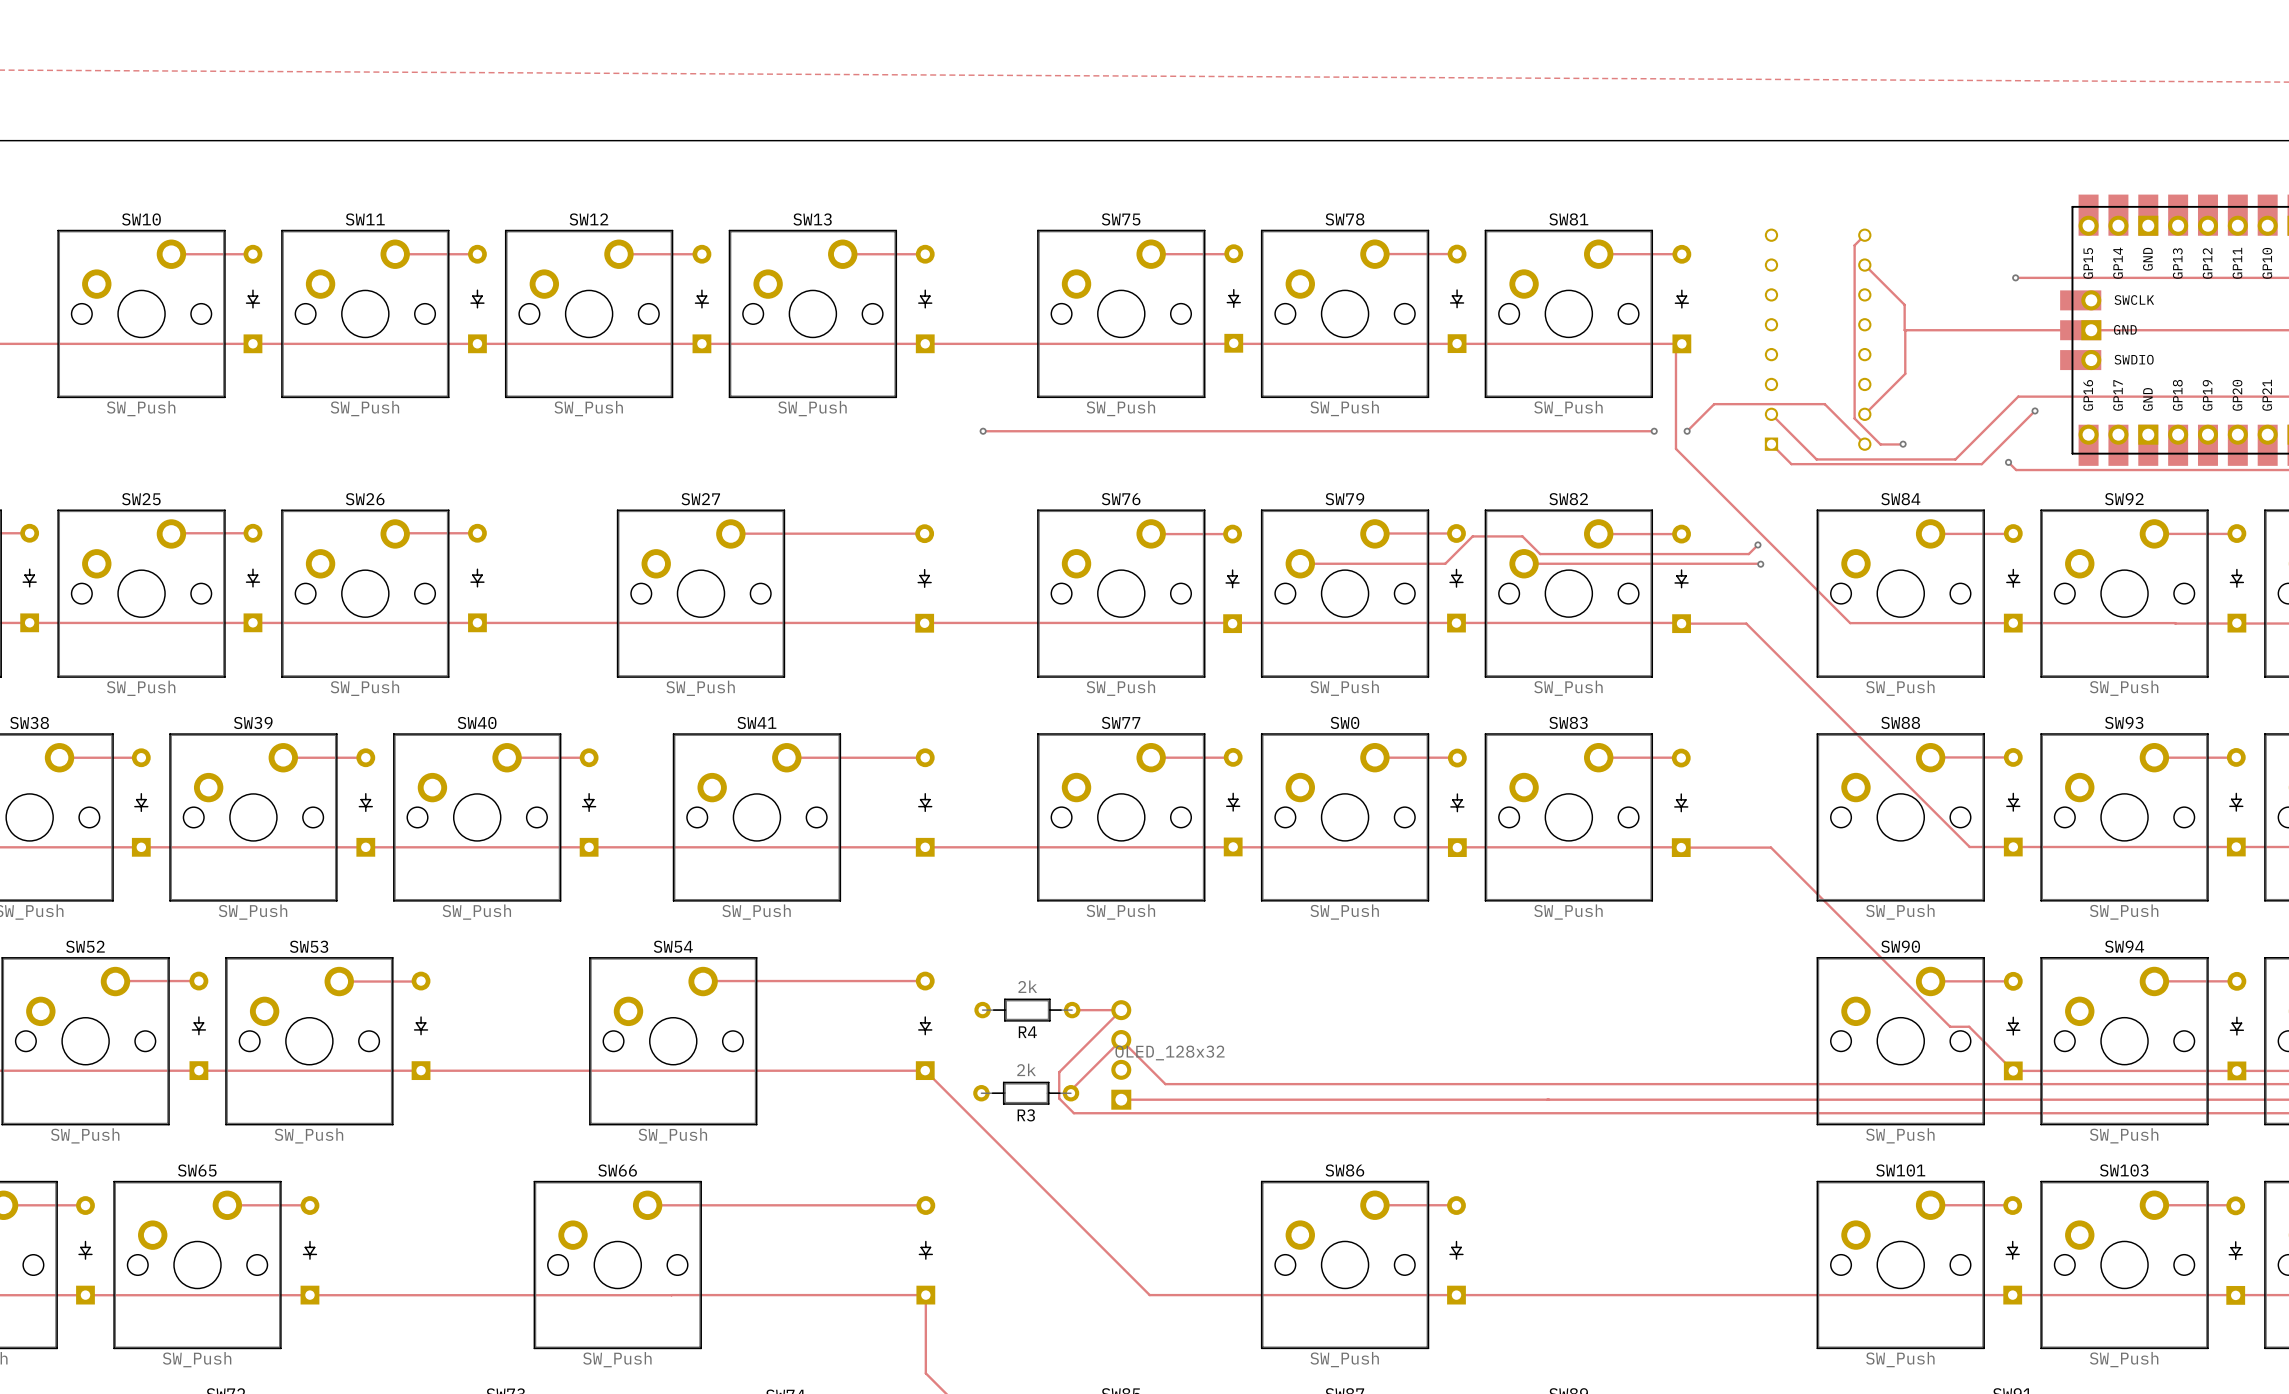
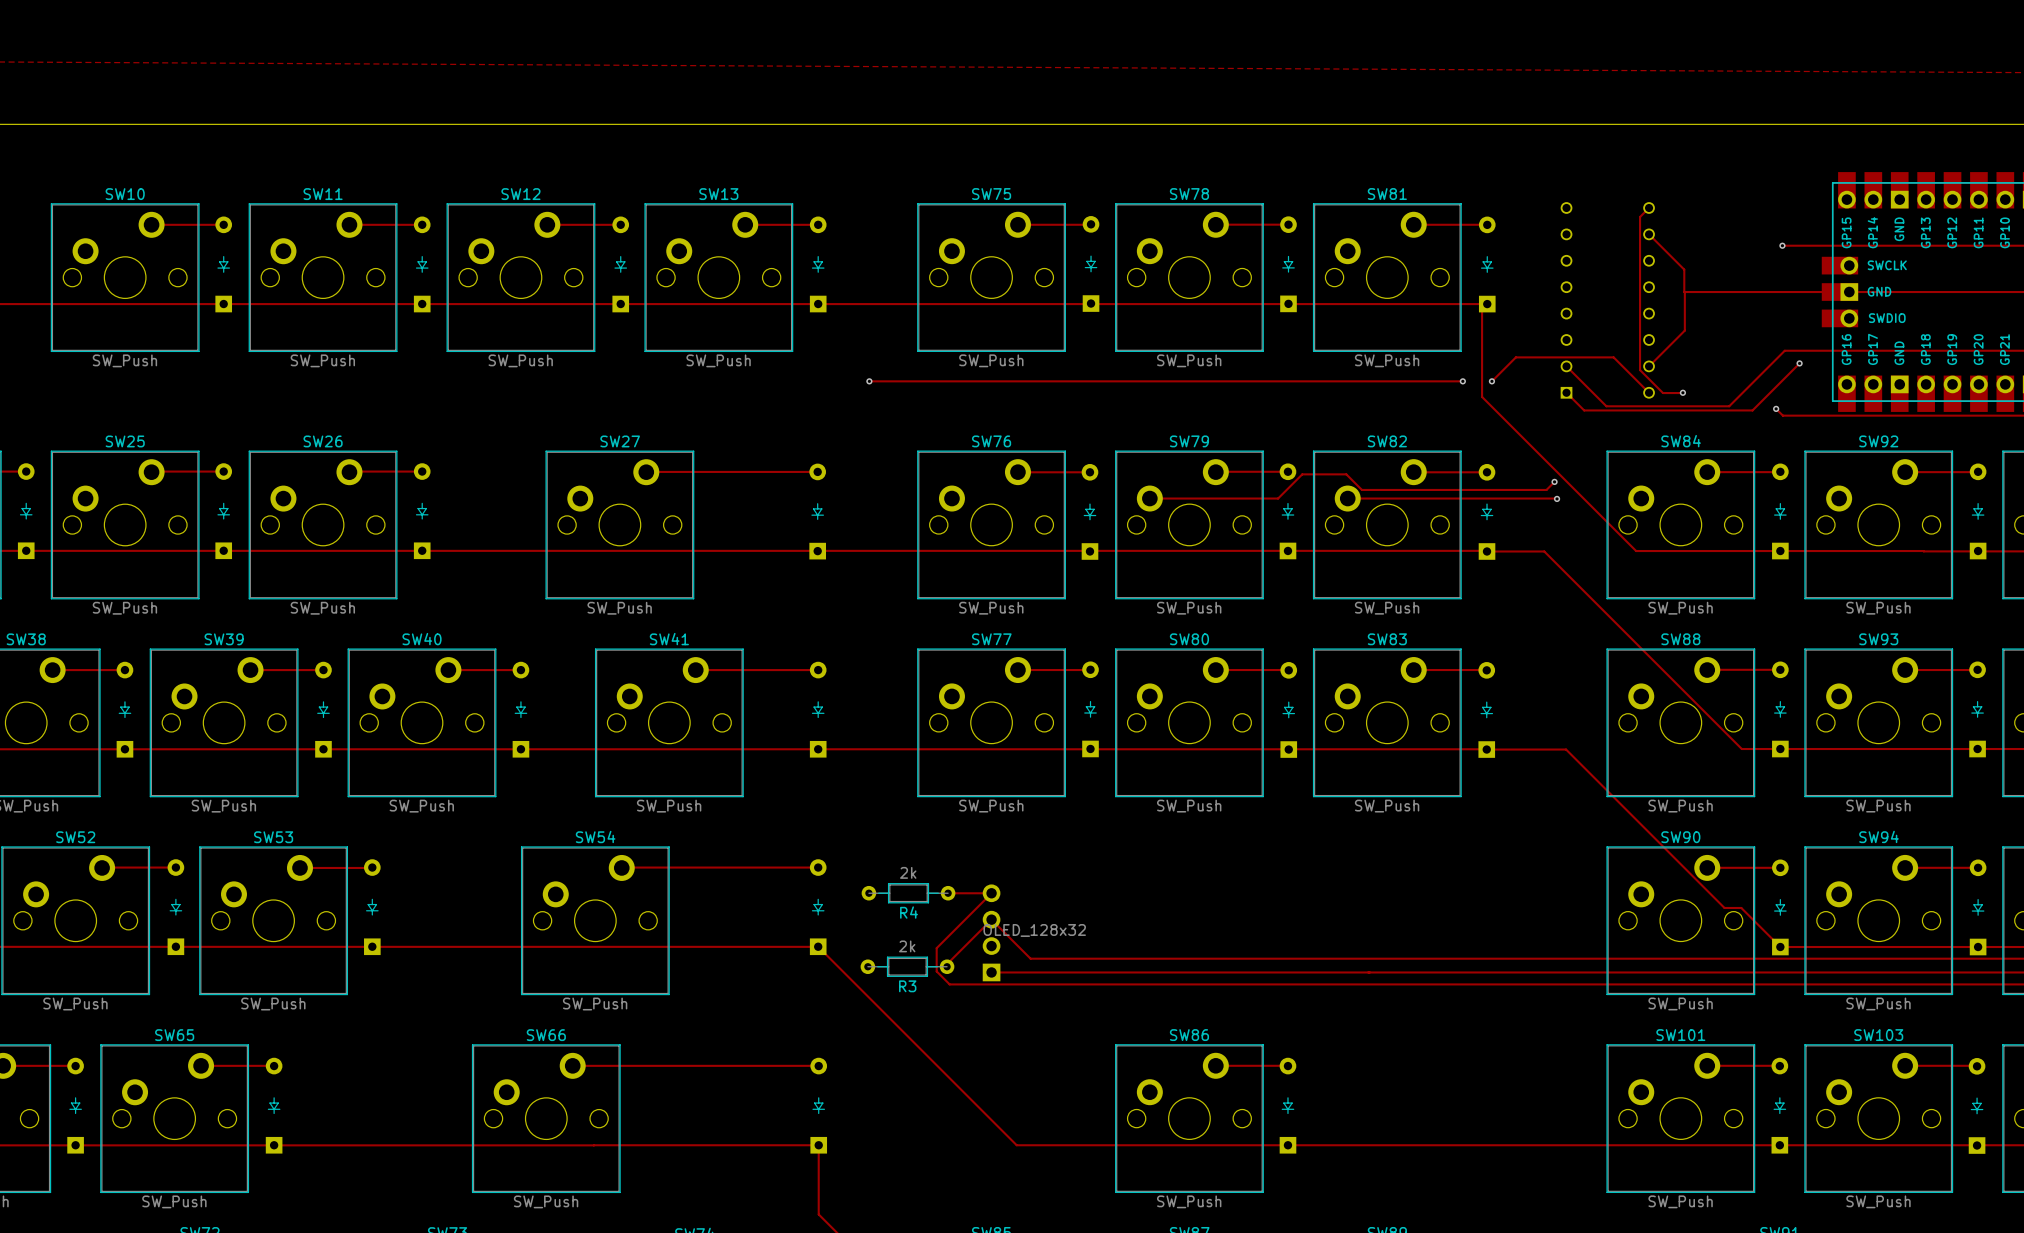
SW0 name: SW0 (1344, 722) -> SW80 (1189, 639)

